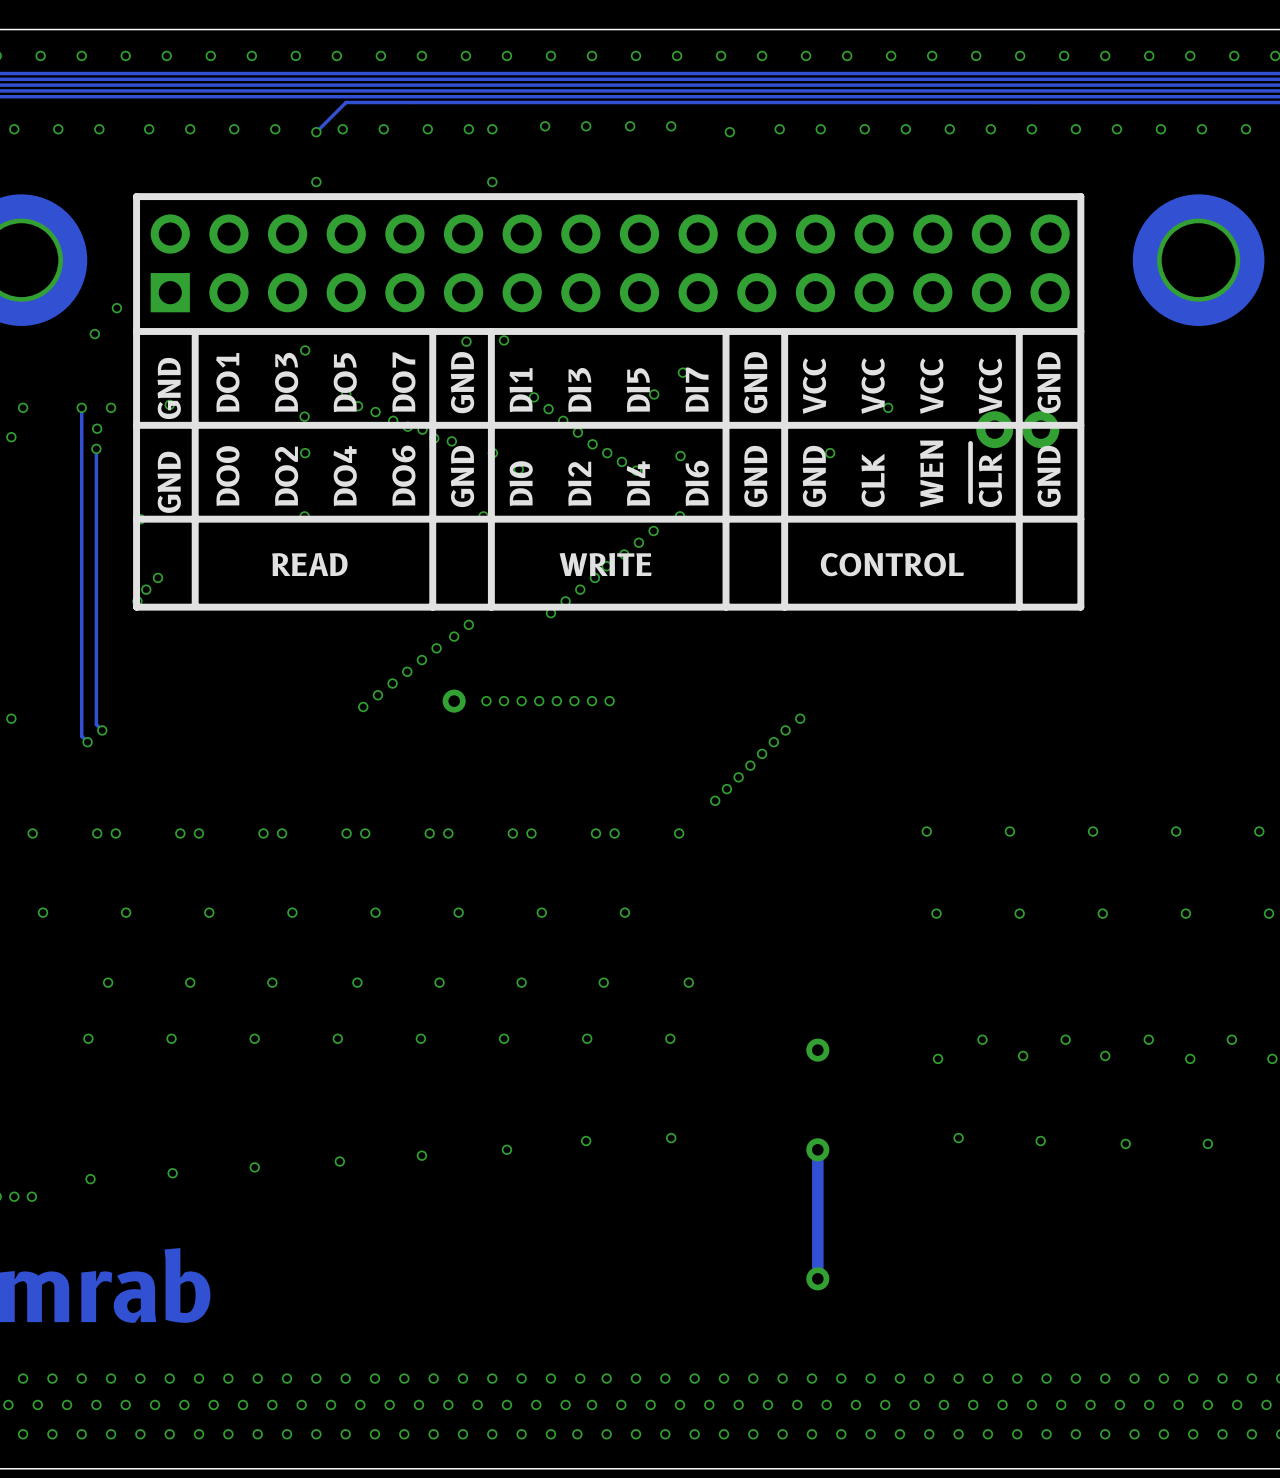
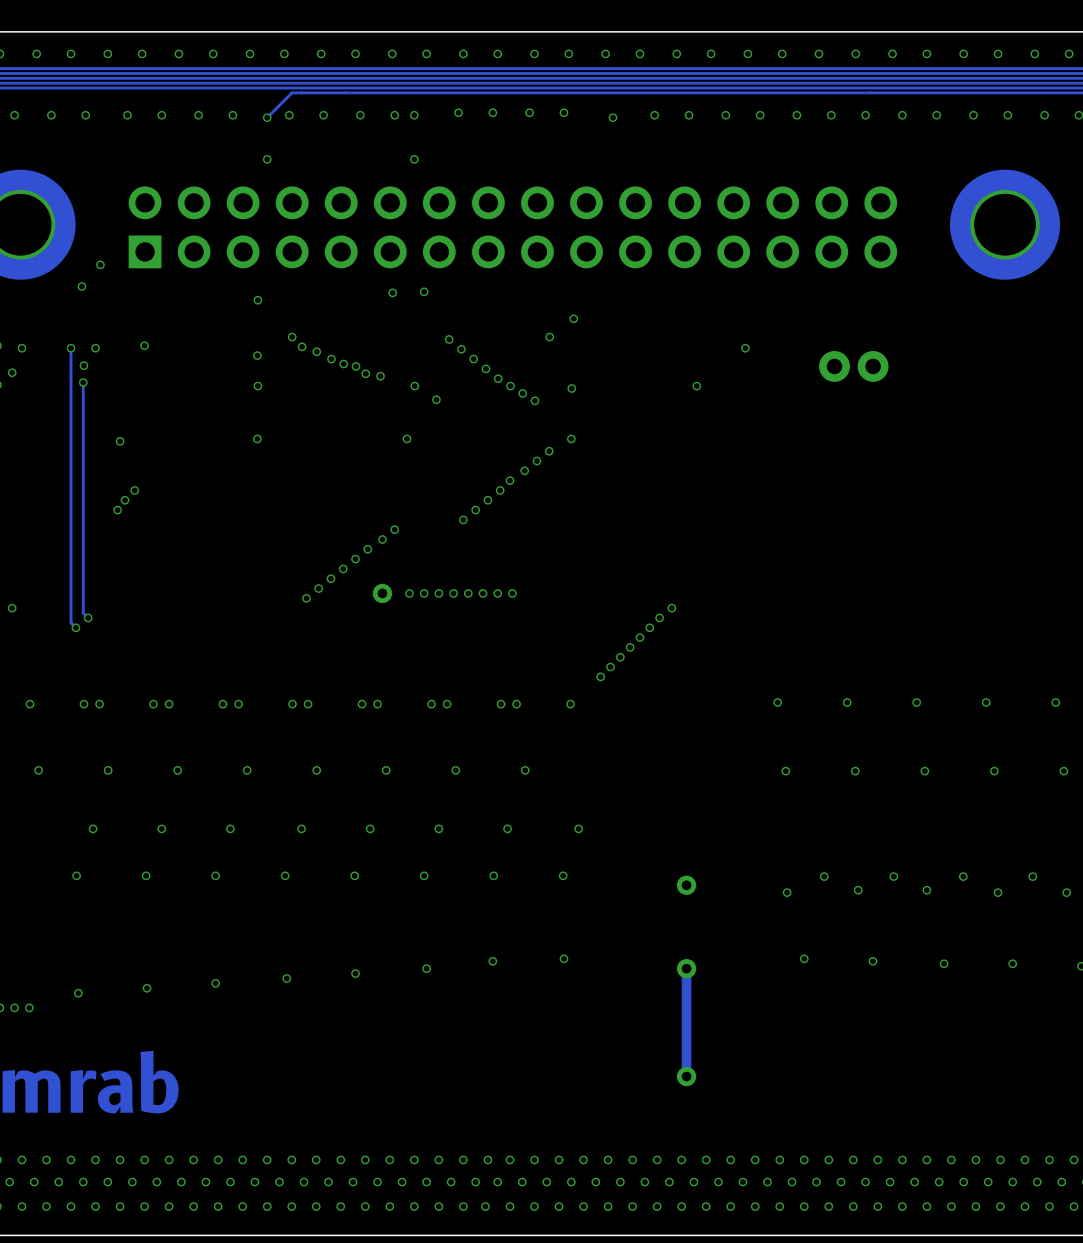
line: (1080, 196) (136, 196) (136, 607) (1080, 607) (1080, 196) -> none
line: (432, 331) (432, 607) (432, 519) -> none
line: (491, 331) (491, 607) -> none
line: (726, 331) (726, 607) -> none
line: (784, 331) (784, 607) -> none
line: (1019, 331) (1019, 607) -> none
line: (1080, 331) (136, 331) -> none
line: (195, 334) (195, 604) -> none
text: DO1 (227, 382) -> none
text: DO3 (286, 382) -> none
text: DO5 (345, 382) -> none
text: DO7 (403, 382) -> none
text: GND (462, 382) -> none
text: GND (755, 382) -> none
text: GND (1049, 382) -> none
text: VCC (814, 386) -> none
text: VCC (873, 386) -> none
text: VCC (931, 386) -> none
text: VCC (990, 386) -> none
text: GND (169, 388) -> none
text: DI7 (696, 389) -> none
text: DI1 (521, 390) -> none
text: DI3 (579, 390) -> none
text: DI5 (638, 390) -> none
line: (1080, 425) (136, 425) -> none
line: (970, 443) (970, 501) -> none
text: WEN (931, 473) -> none
text: DO6 (403, 475) -> none
text: DO0 (227, 476) -> none
text: DO2 (286, 476) -> none
text: DO4 (345, 476) -> none
text: GND (462, 476) -> none
text: GND (755, 476) -> none
text: GND (814, 476) -> none
text: GND (1049, 476) -> none
text: CLK (873, 480) -> none
text: CLR (990, 480) -> none
text: GND (169, 482) -> none
text: DI0 (521, 483) -> none
text: DI2 (579, 483) -> none
text: DI4 (638, 483) -> none
text: DI6 (697, 483) -> none
line: (1080, 519) (136, 519) -> none
text: READ (309, 564) -> none
text: WRITE (605, 564) -> none
text: CONTROL (892, 564) -> none

